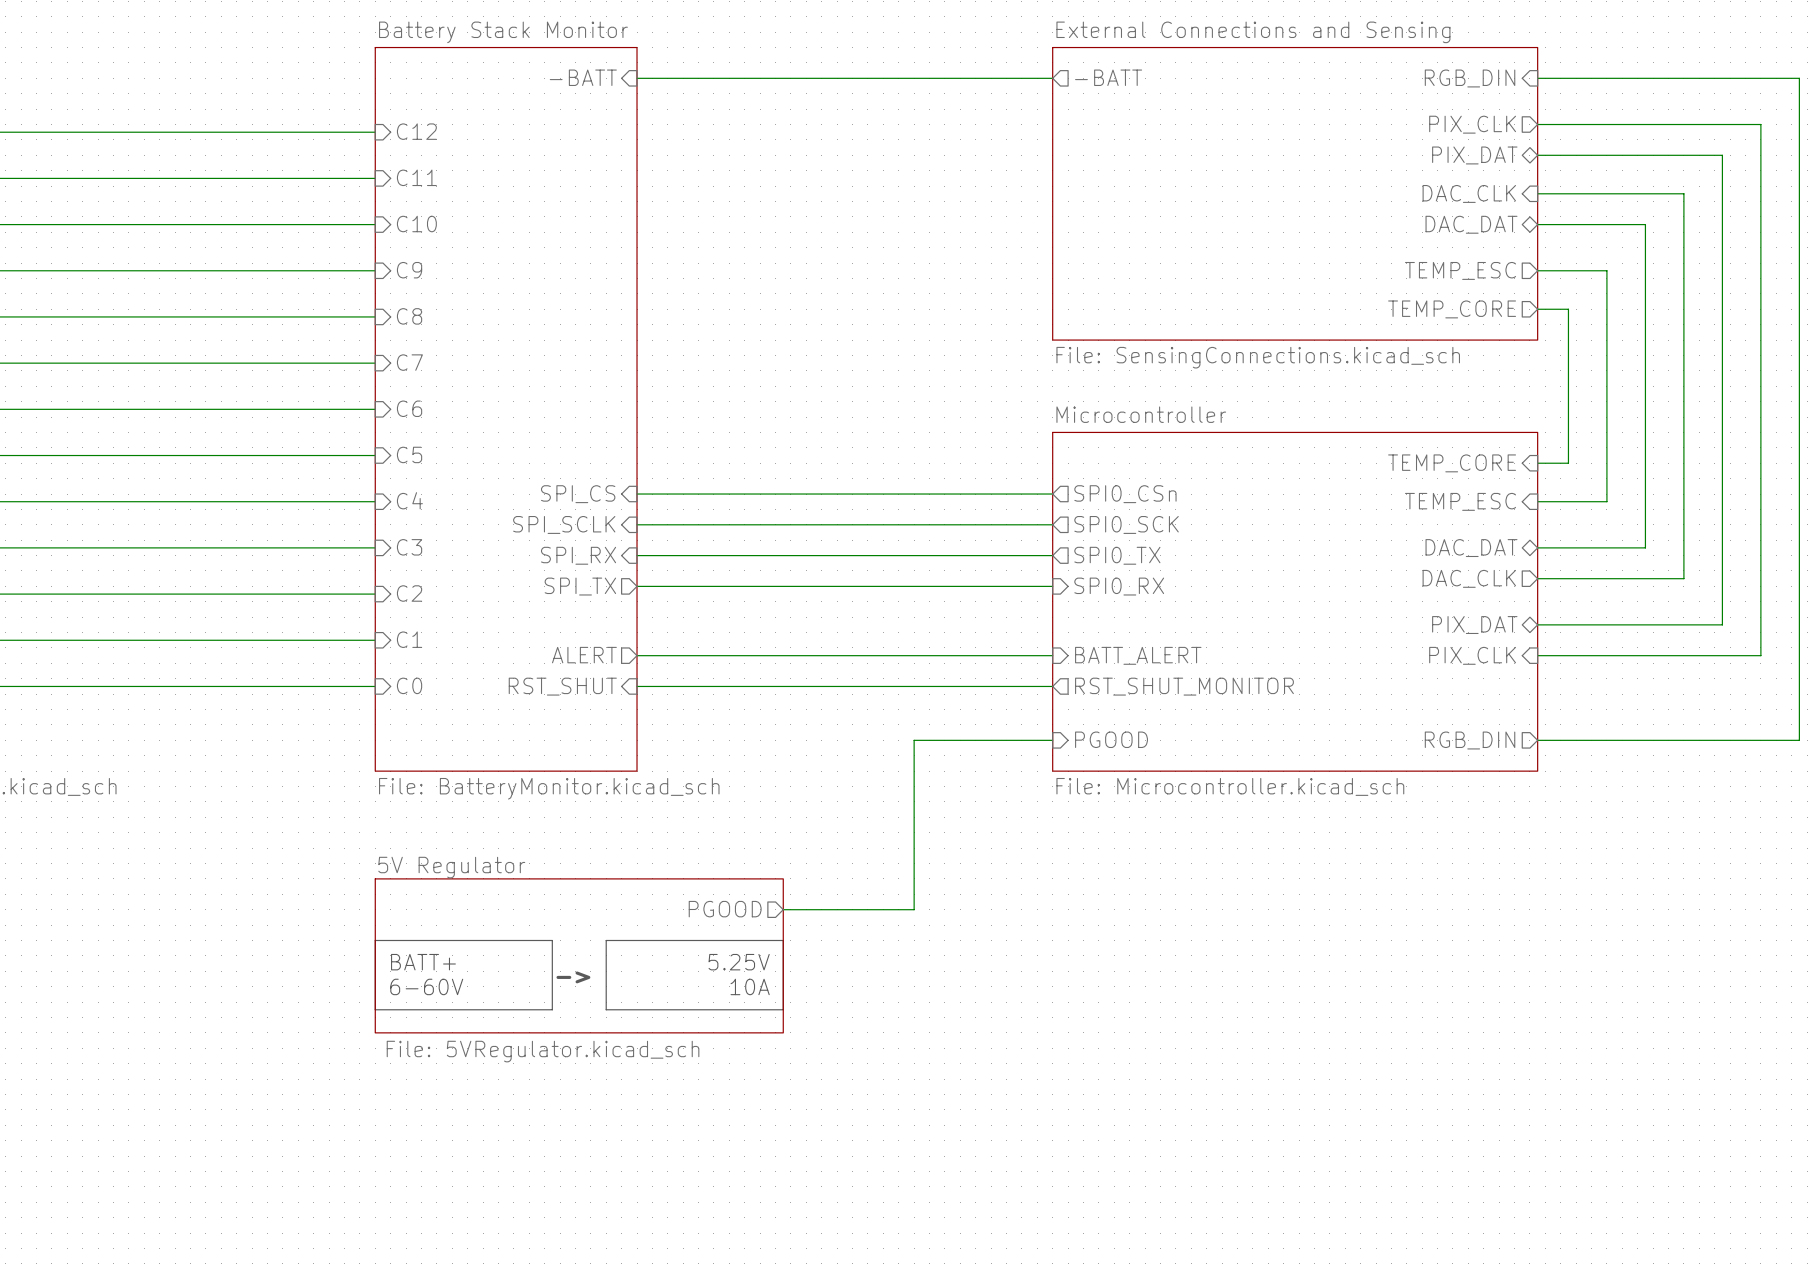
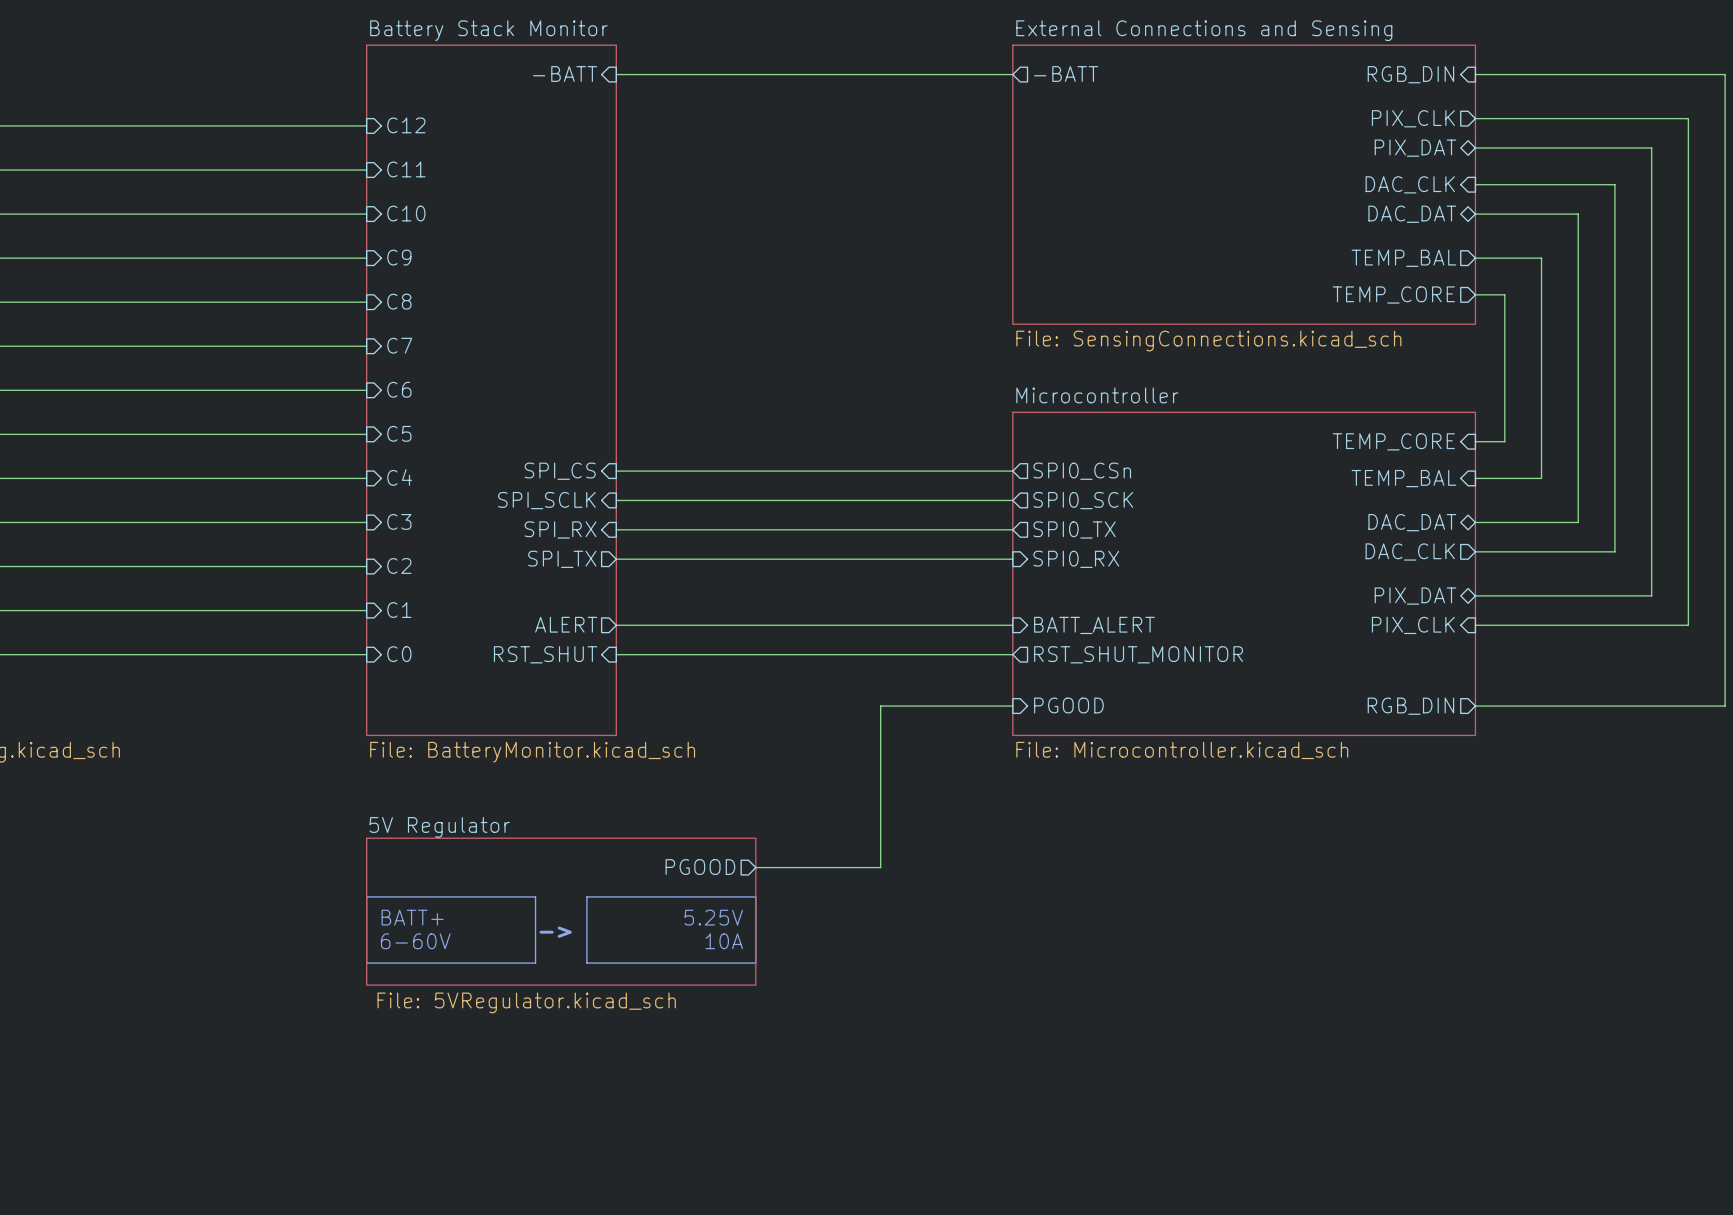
sheet pin: TEMP_ESC (1460, 270) -> TEMP_BAL (1403, 258)
sheet pin: TEMP_ESC (1460, 501) -> TEMP_BAL (1403, 478)

